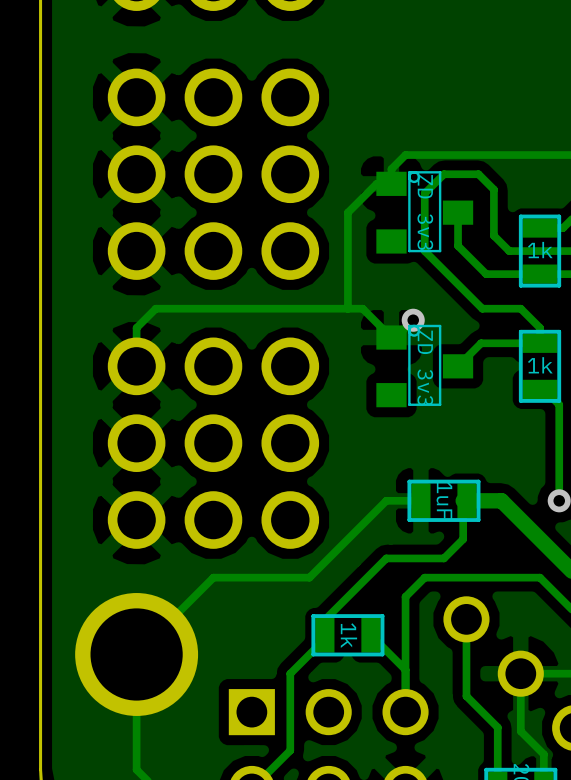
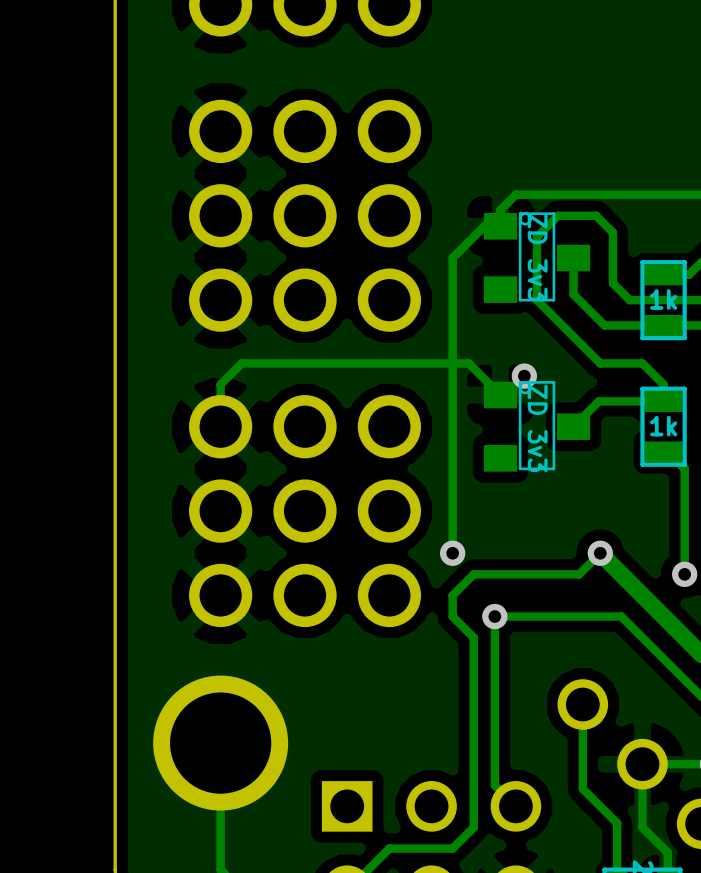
track: none -> (452, 363) (452, 553)
via: none -> (452, 553)
via: none -> (600, 553)
track: (386, 500) (309, 577) (213, 577) (136, 654) -> none
part: 1uF (443, 500) -> none
track: (501, 500) (463, 500) (463, 539) (443, 558) (386, 558) (324, 619) (324, 639) (290, 673) (290, 750) -> (494, 574) (473, 574) (452, 595) (452, 616) (473, 637) (473, 827) (452, 848) (389, 848)
track: none -> (621, 574) (600, 553) (579, 574) (532, 574)
via: none -> (494, 616)
track: (540, 577) (424, 577) (405, 596) (405, 712) -> (663, 658) (621, 616) (494, 616) (494, 785) (515, 806)
part: 1k (347, 635) -> none
track: (370, 635) (405, 669) -> none

